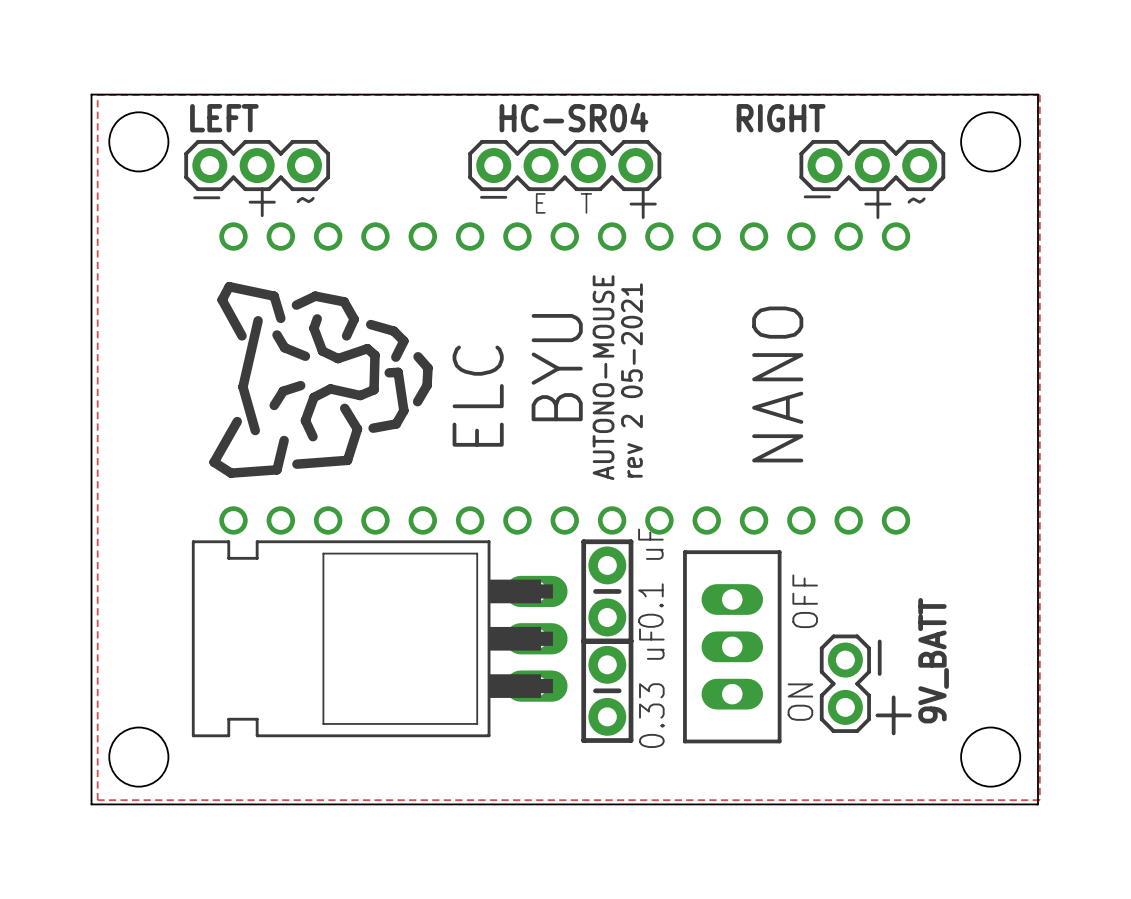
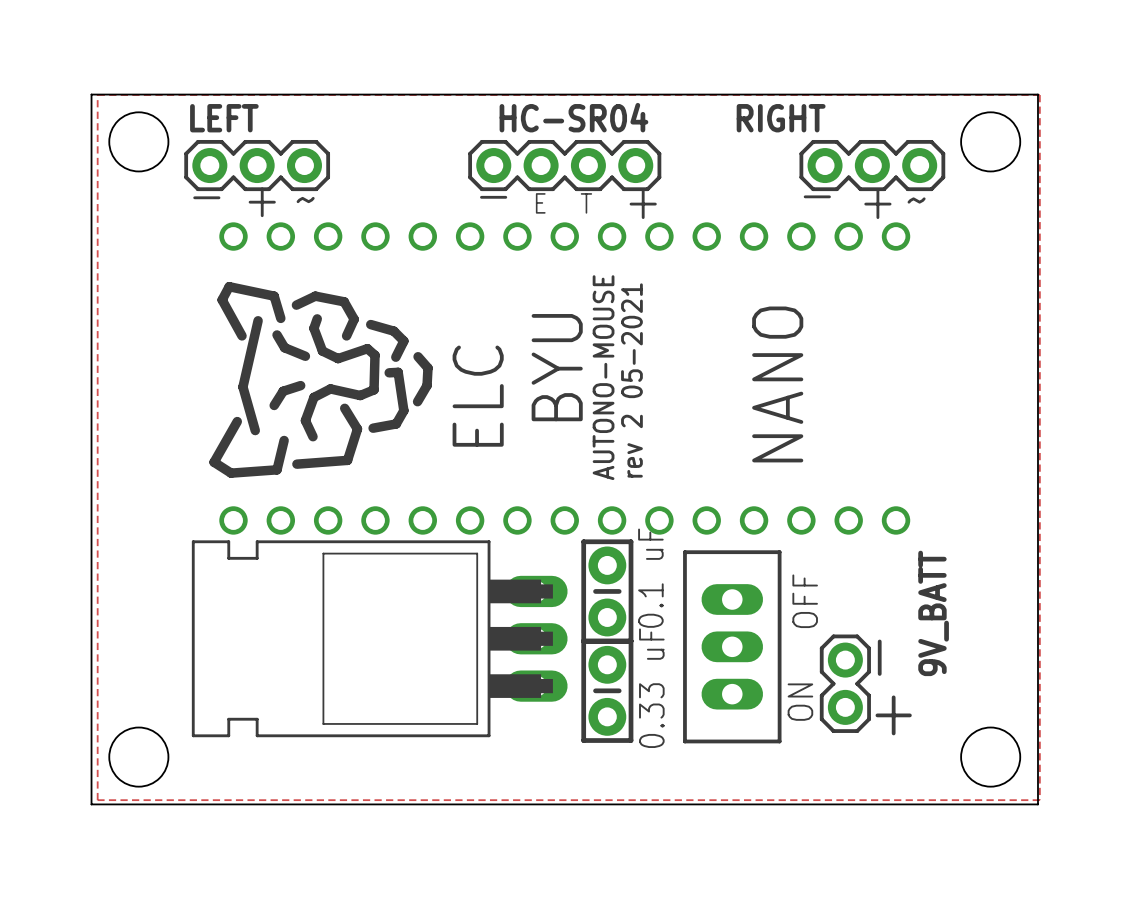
9V_BATT name position: 9V_BATT (933, 660) -> 9V_BATT (933, 613)

